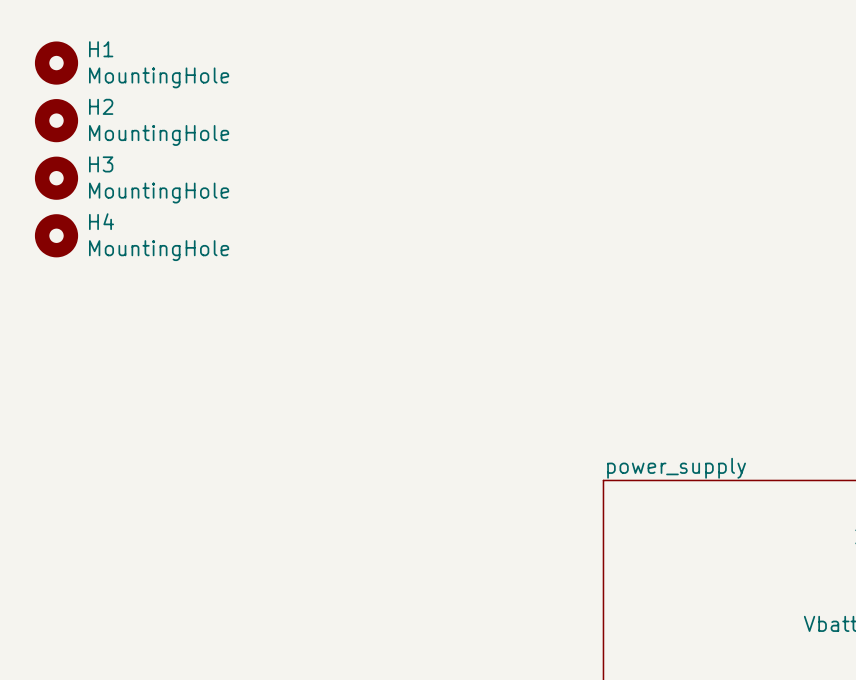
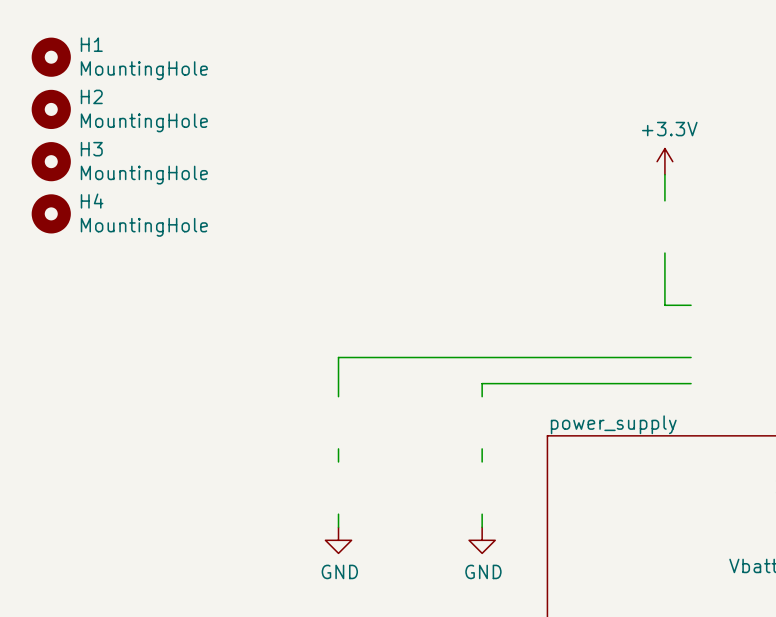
power symbol: none -> +3.3V (664, 161)
wire: none -> (664, 174) (664, 200)
wire: none -> (664, 253) (664, 305) (691, 305)
wire: none -> (691, 357) (338, 357) (338, 396)
wire: none -> (691, 383) (482, 383) (482, 396)
wire: none -> (338, 448) (338, 461)
wire: none -> (482, 448) (482, 461)
wire: none -> (338, 514) (338, 527)
wire: none -> (482, 514) (482, 527)
power symbol: none -> GND (338, 540)
power symbol: none -> GND (482, 540)

